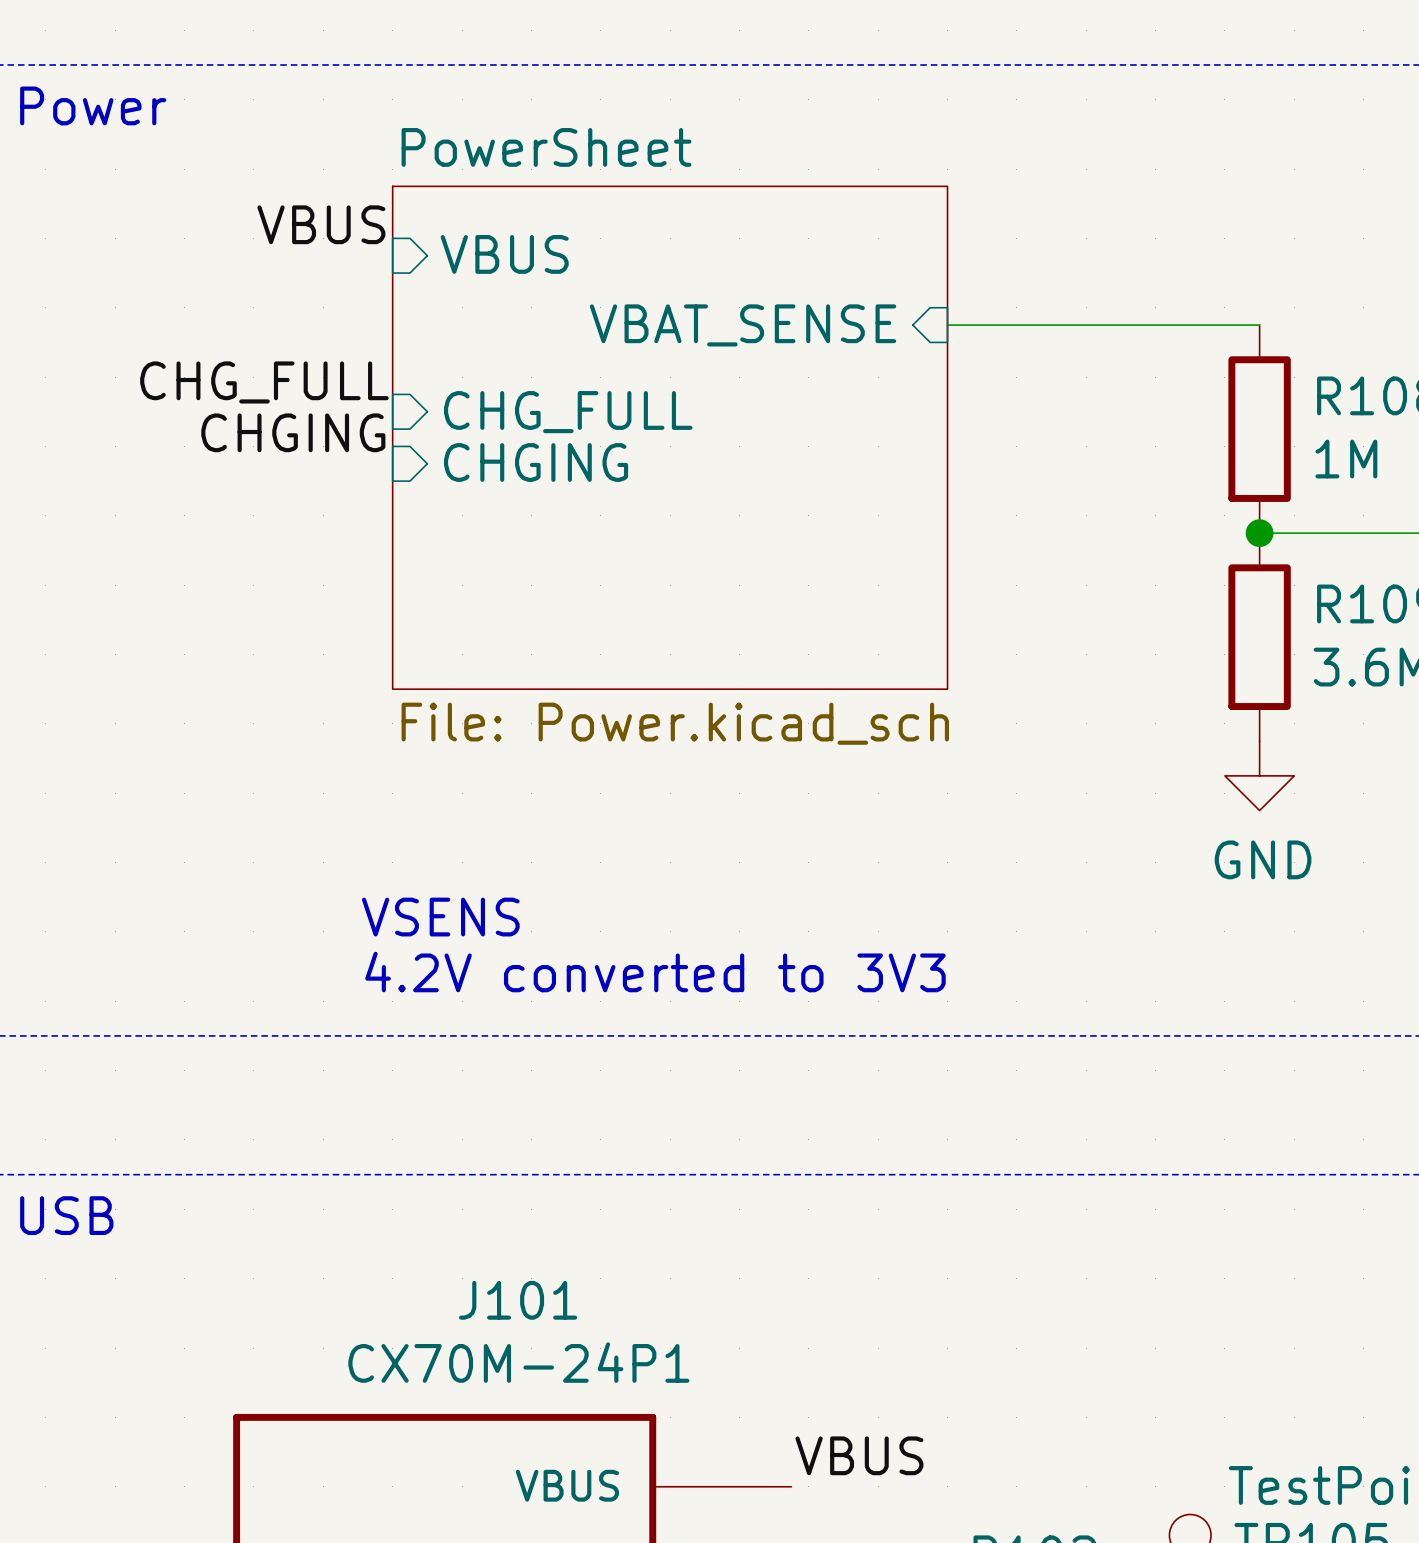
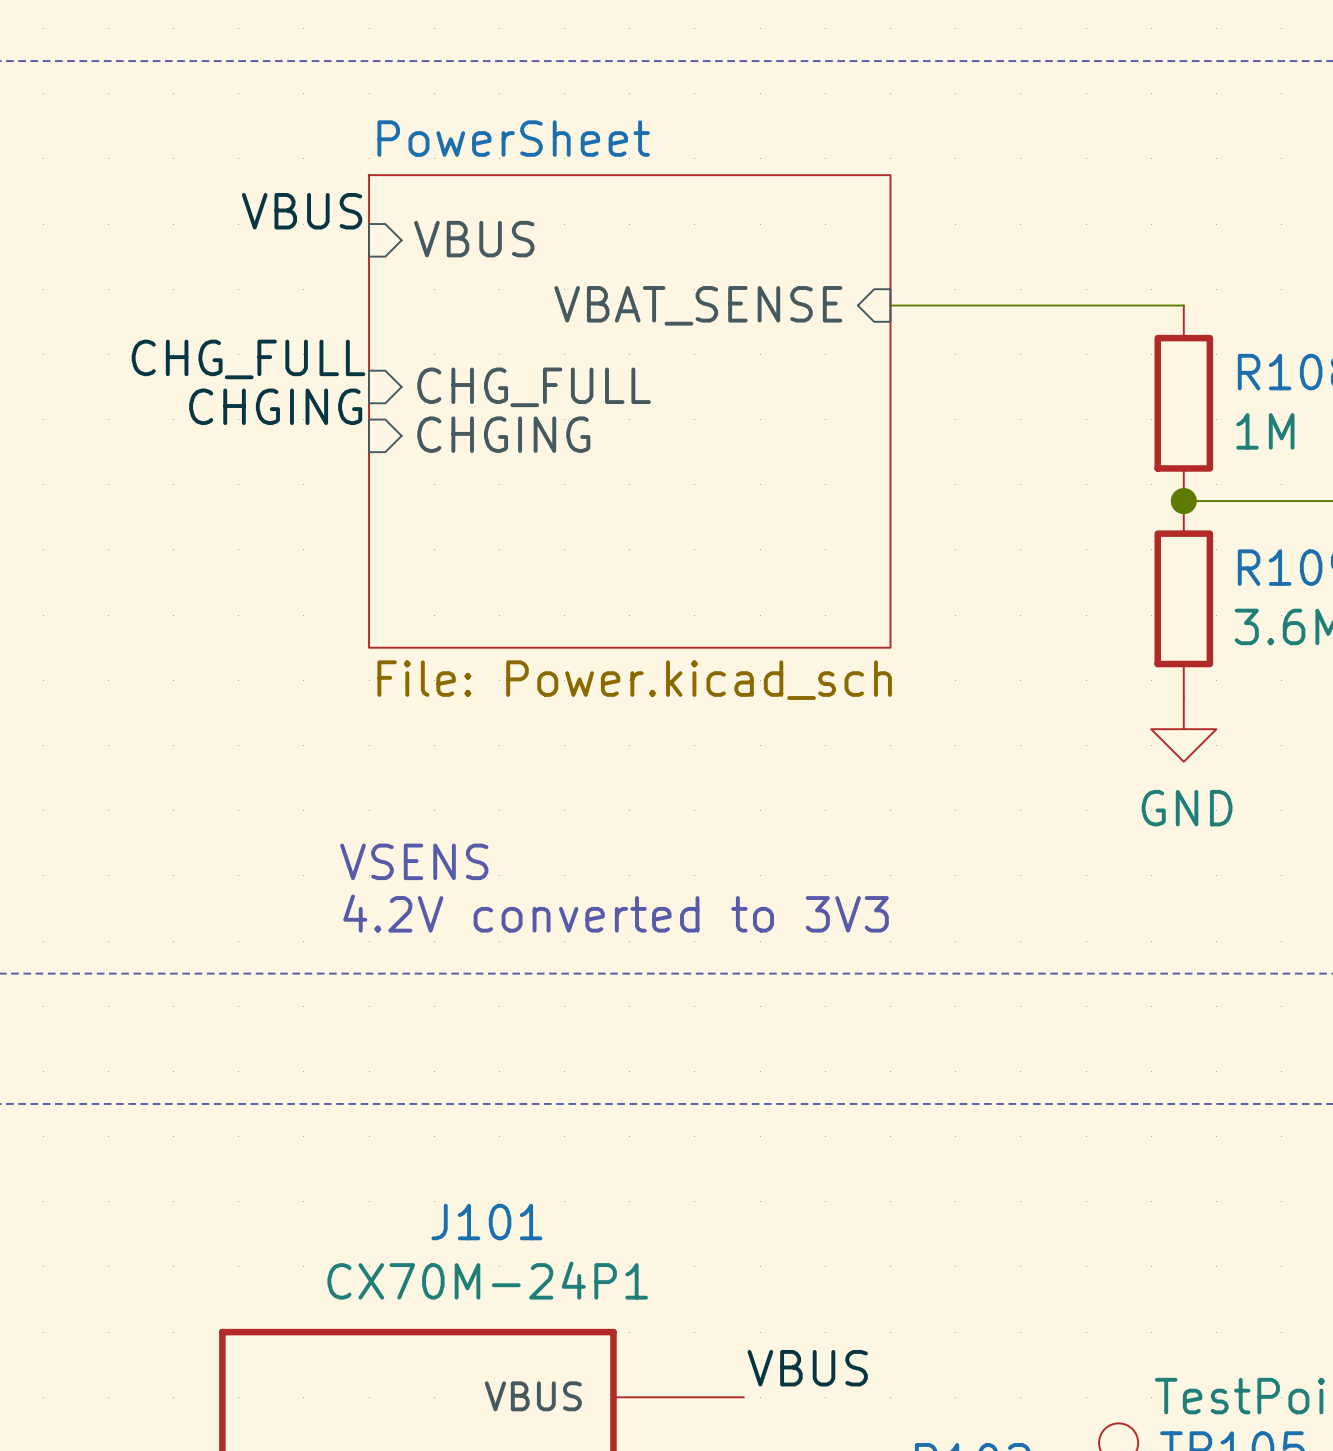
text: Power (93, 105) -> none
text: USB (66, 1215) -> none

